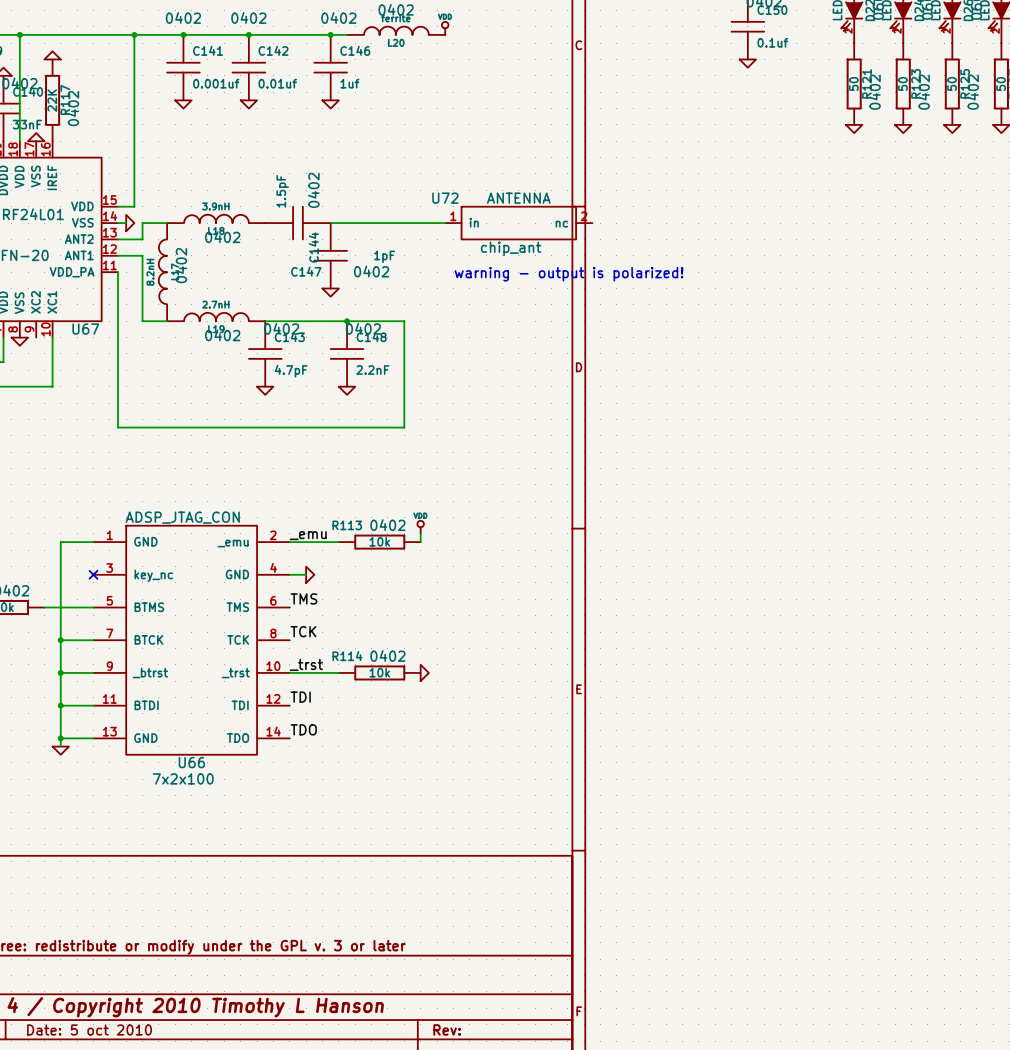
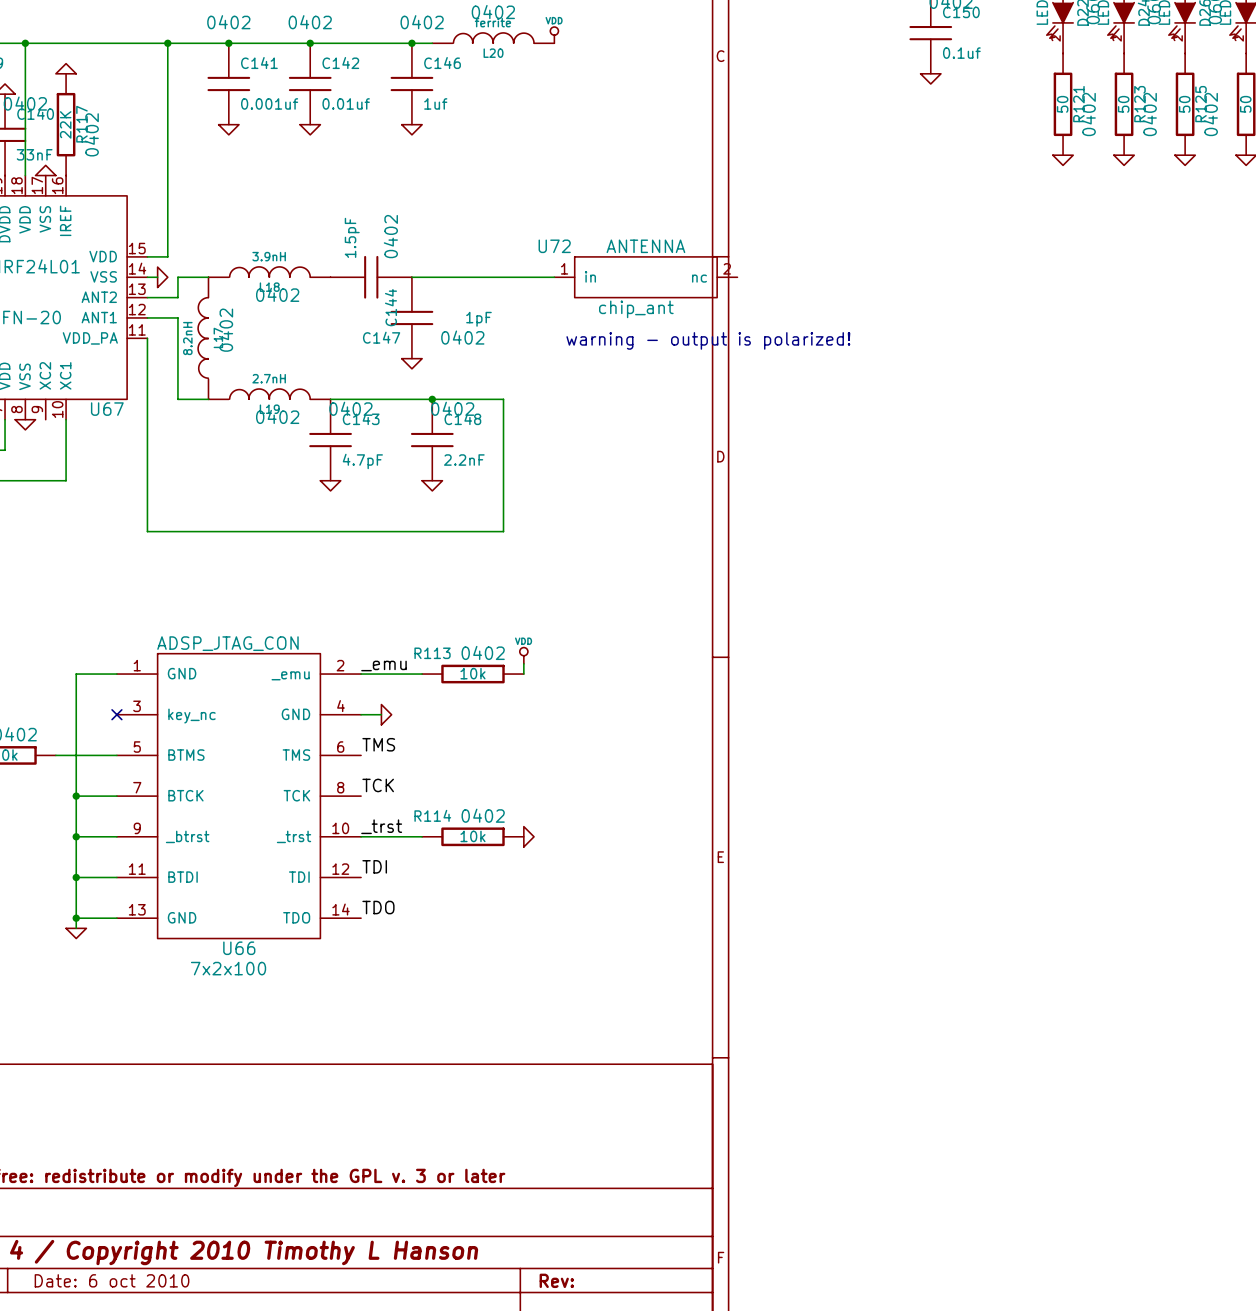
title block: Date: 5 oct 2010 (89, 1029) -> Date: 6 oct 2010 (112, 1280)

